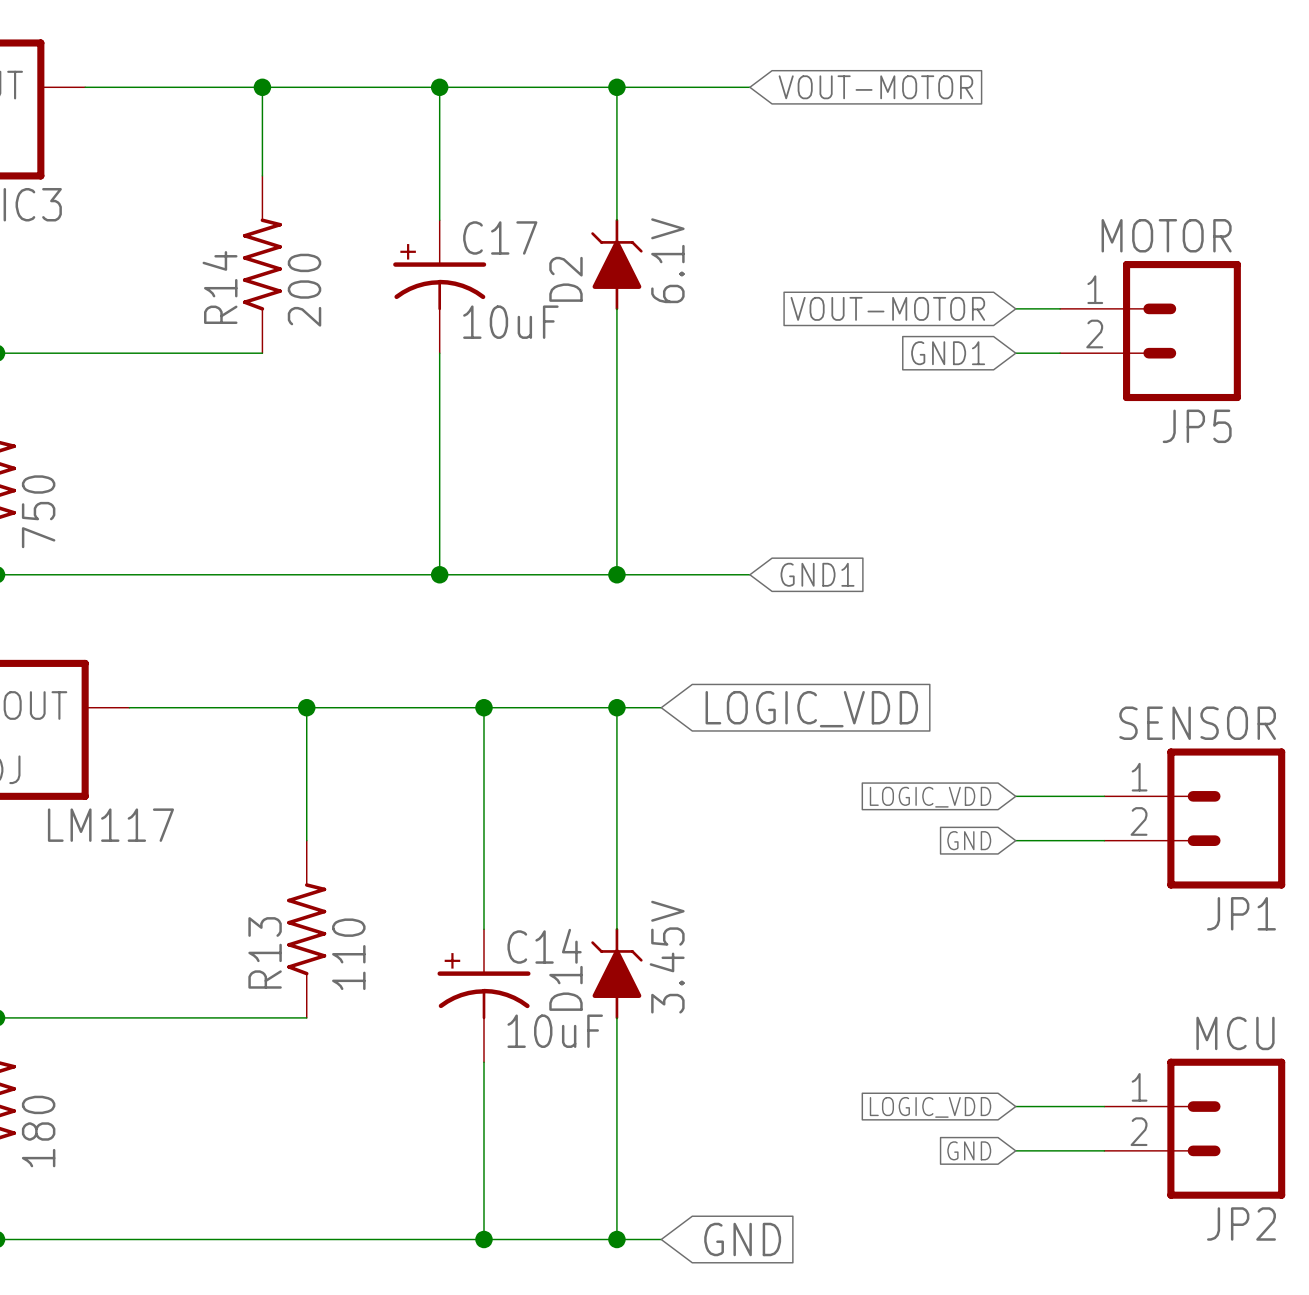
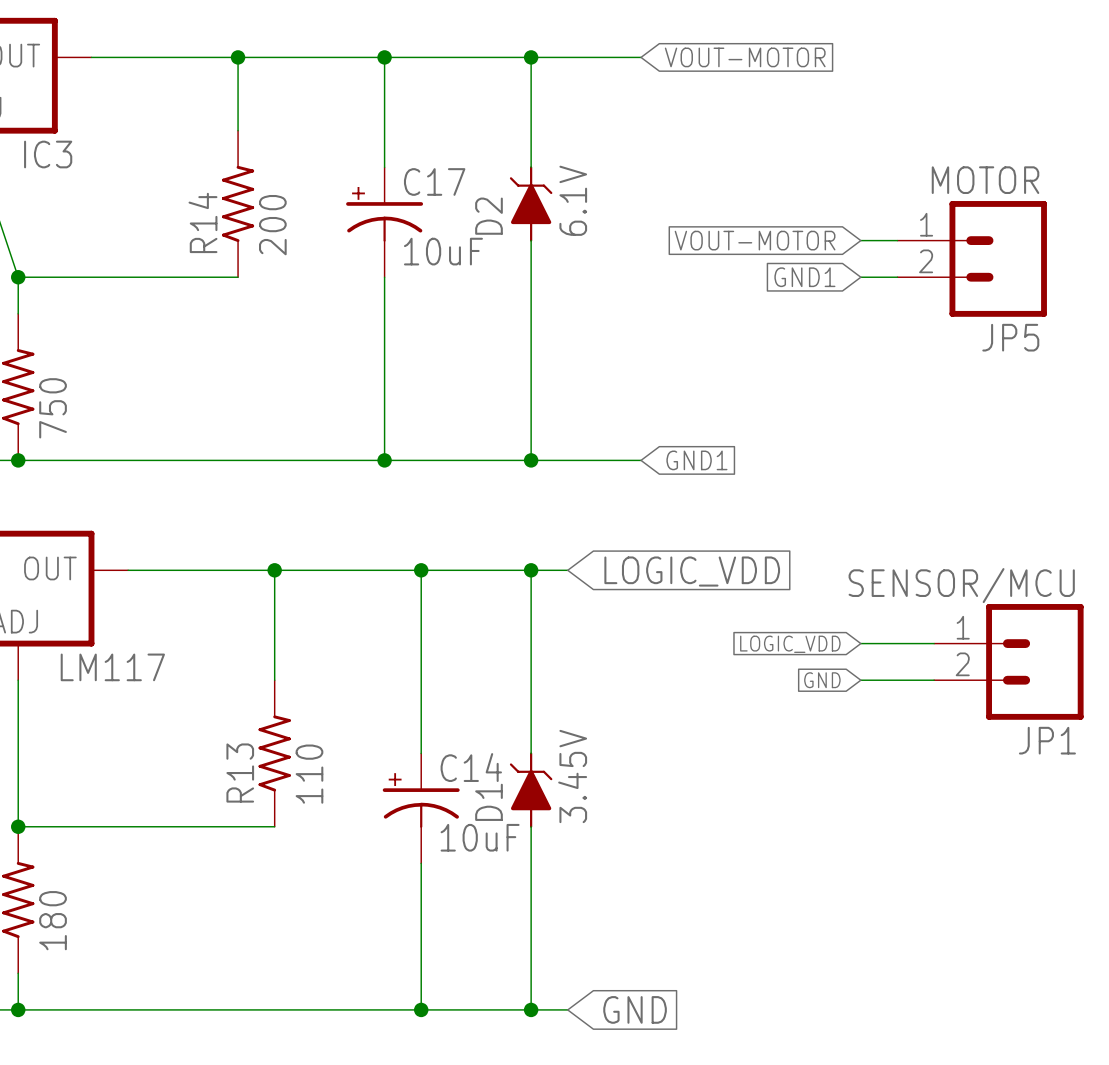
JP1 value: SENSOR (1197, 723) -> SENSOR/MCU (961, 585)
wire: (1015, 1106) (1104, 1106) -> none
global label: LOGIC_VDD (930, 1107) -> none
JP2: MCU (1194, 1128) -> none
global label: GND (969, 1150) -> none
wire: (1015, 1150) (1104, 1150) -> none

